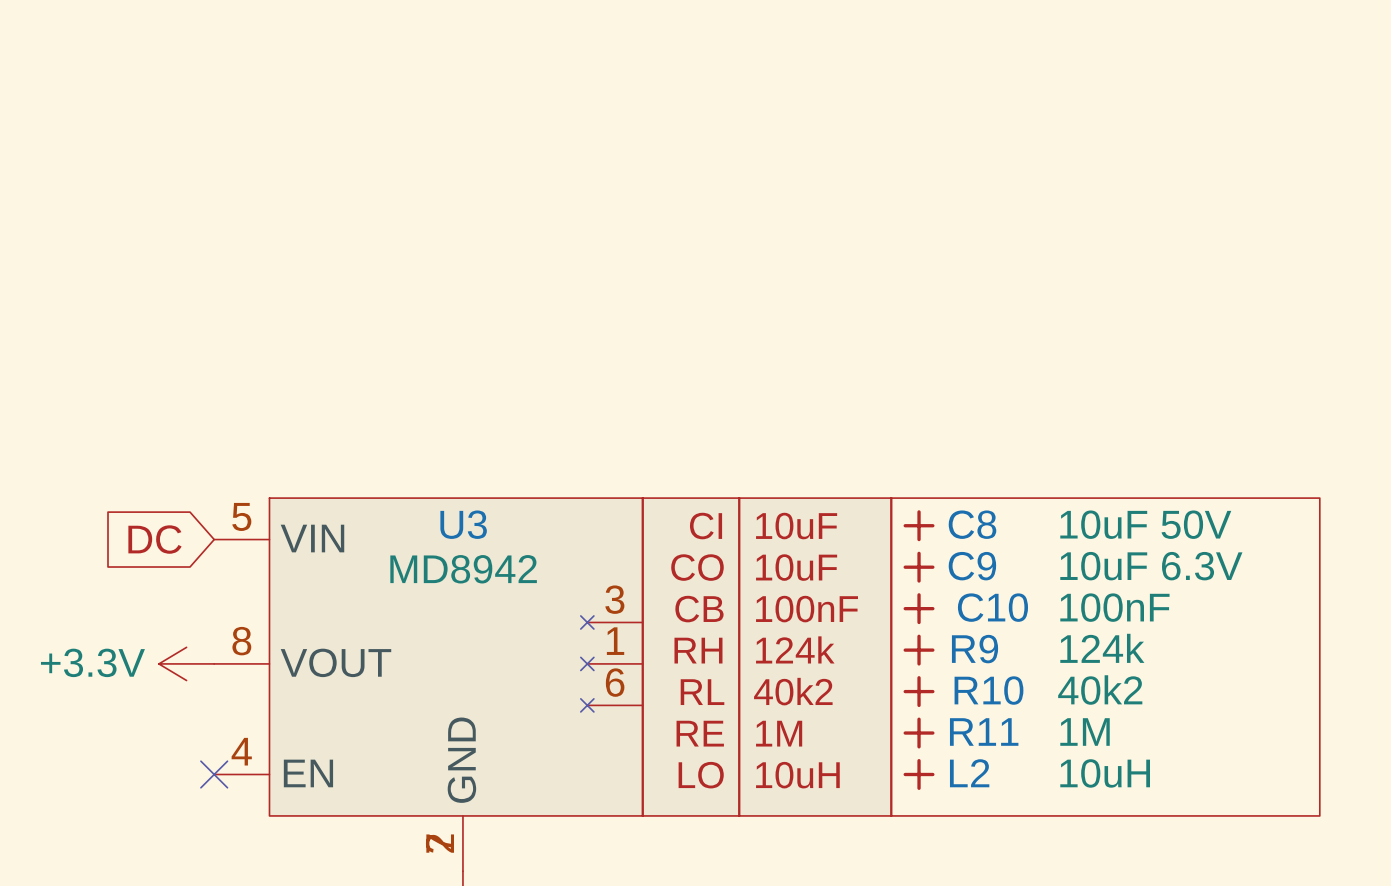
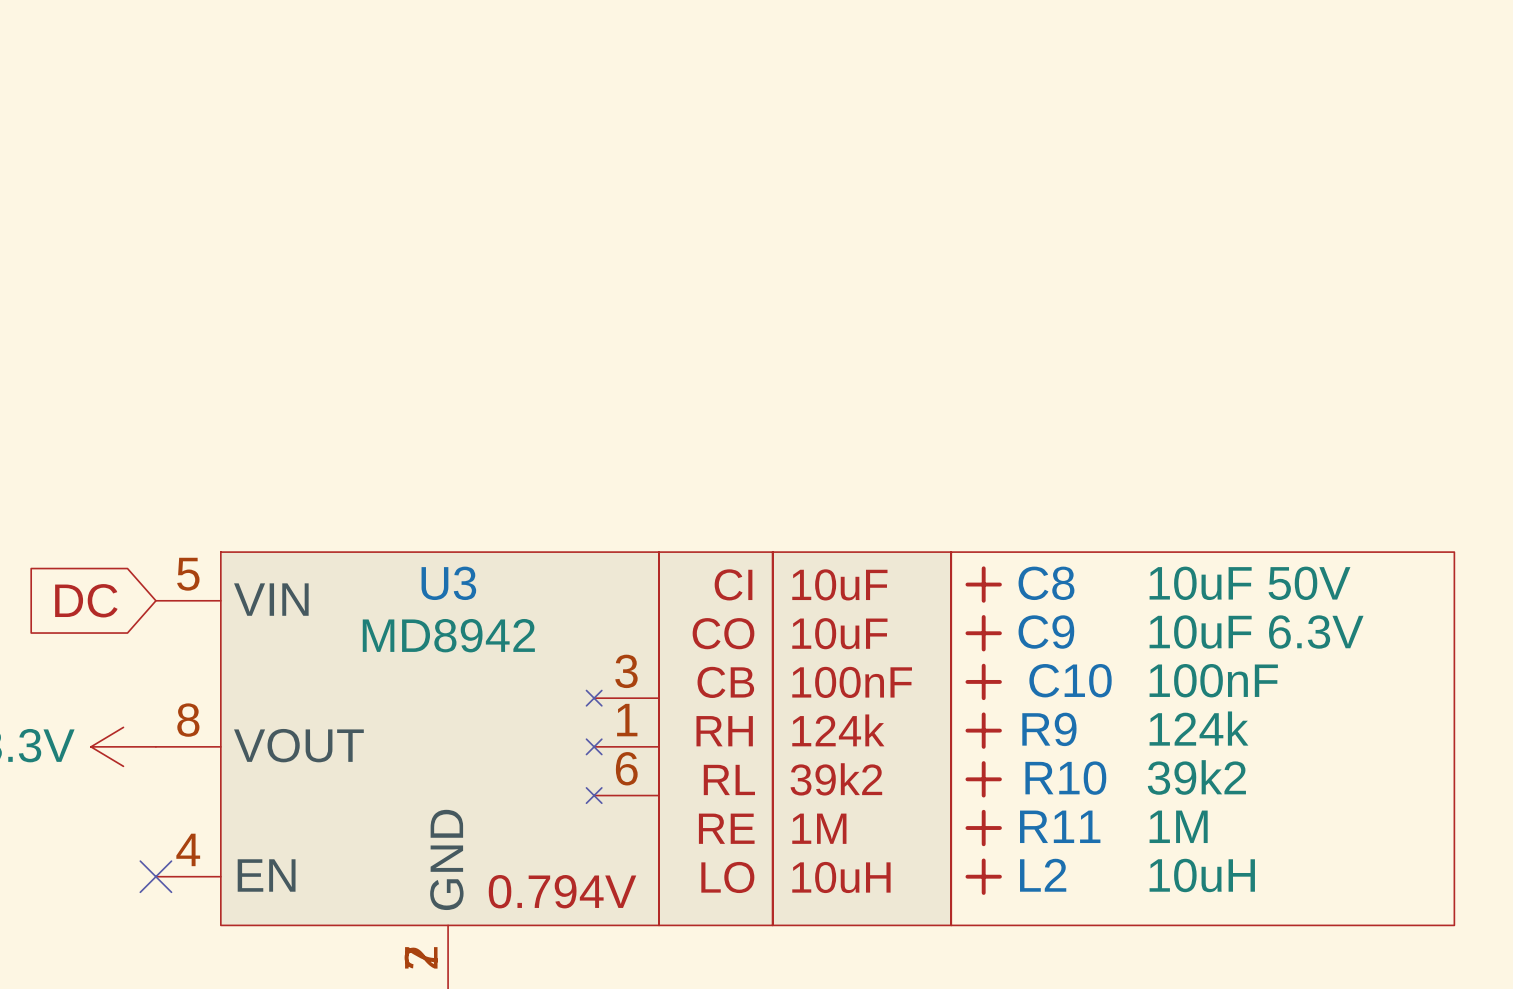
R10 value: 40k2 (1100, 690) -> 39k2 (1196, 777)
U3 text: 40k2 (793, 691) -> 39k2 (836, 779)
U3 text: none -> 0.794V (562, 891)

